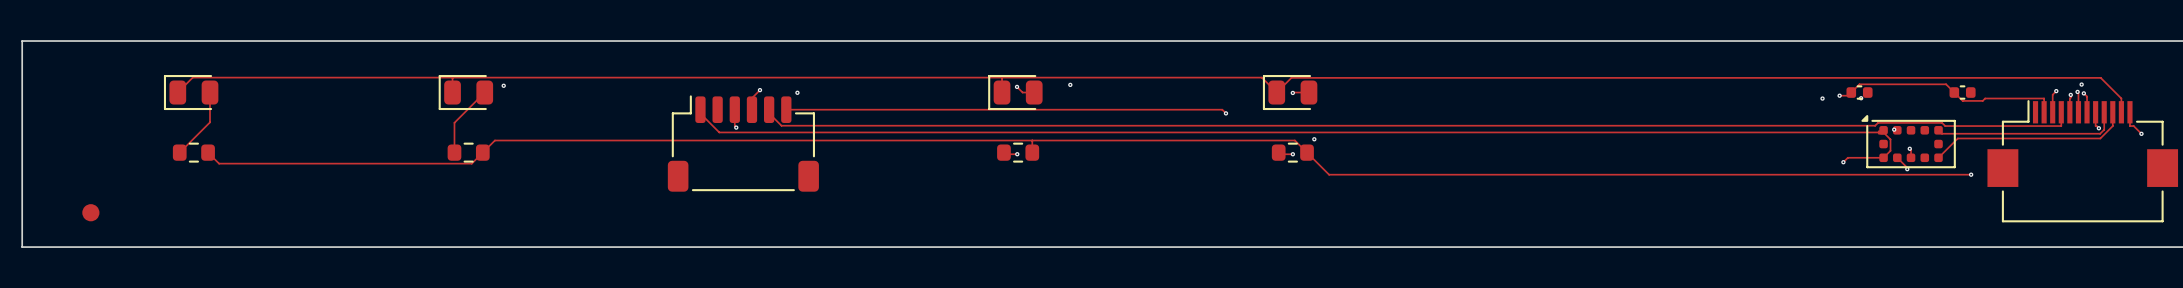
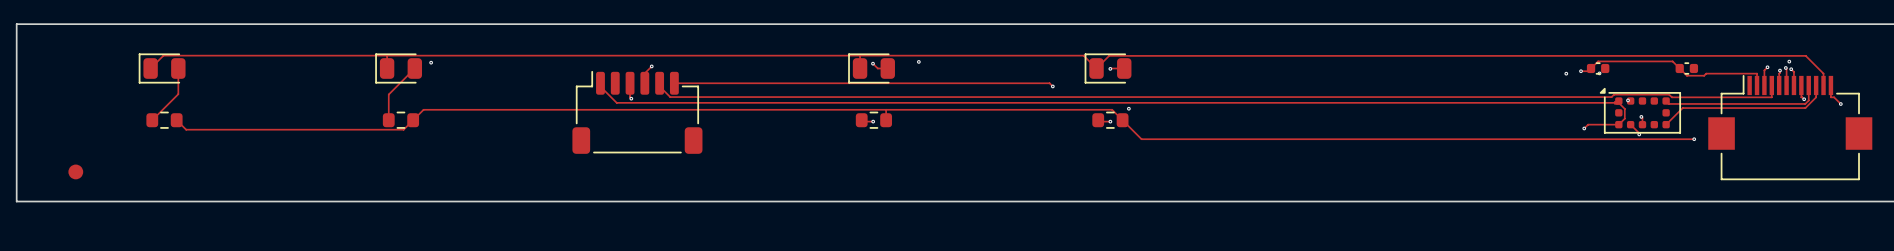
via: (797, 92) -> none

